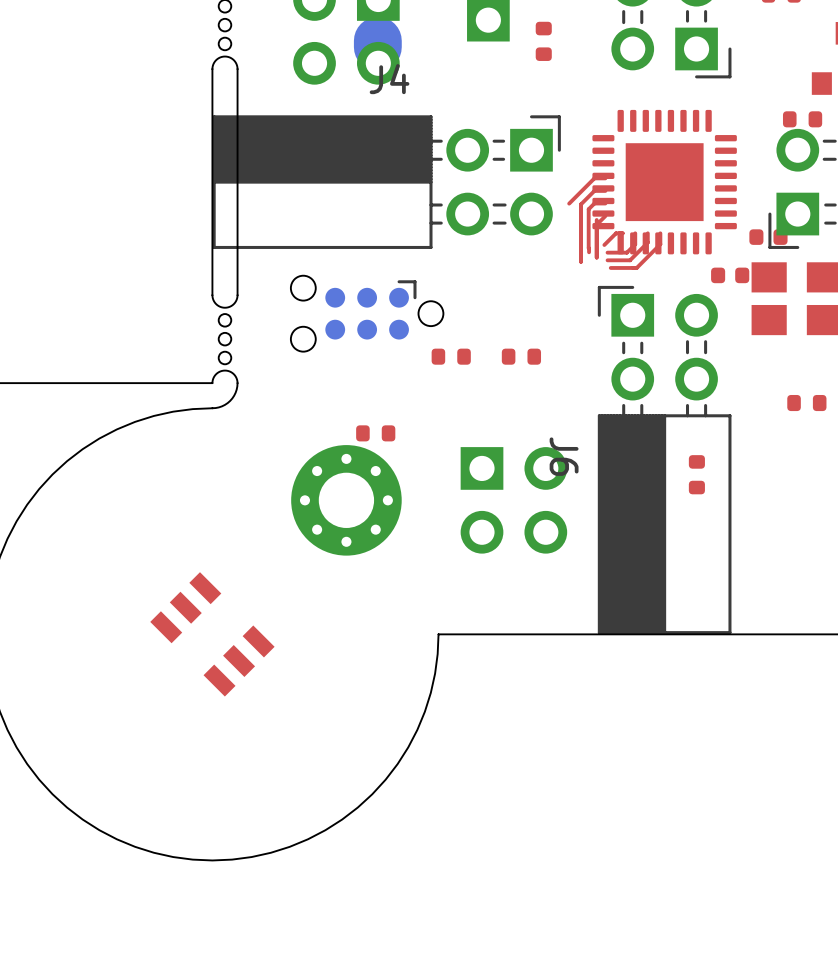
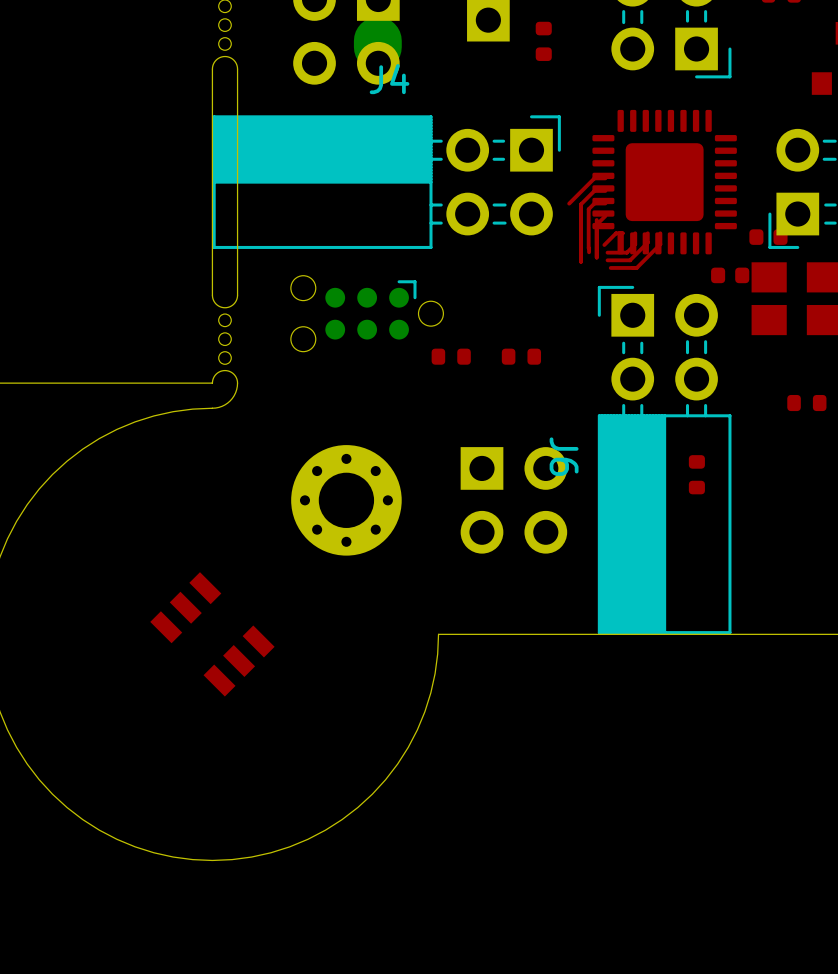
part footprint: [592, 109, 737, 255] -> [592, 109, 737, 255]
part: (802, 119) -> none
part: (375, 433) -> none

